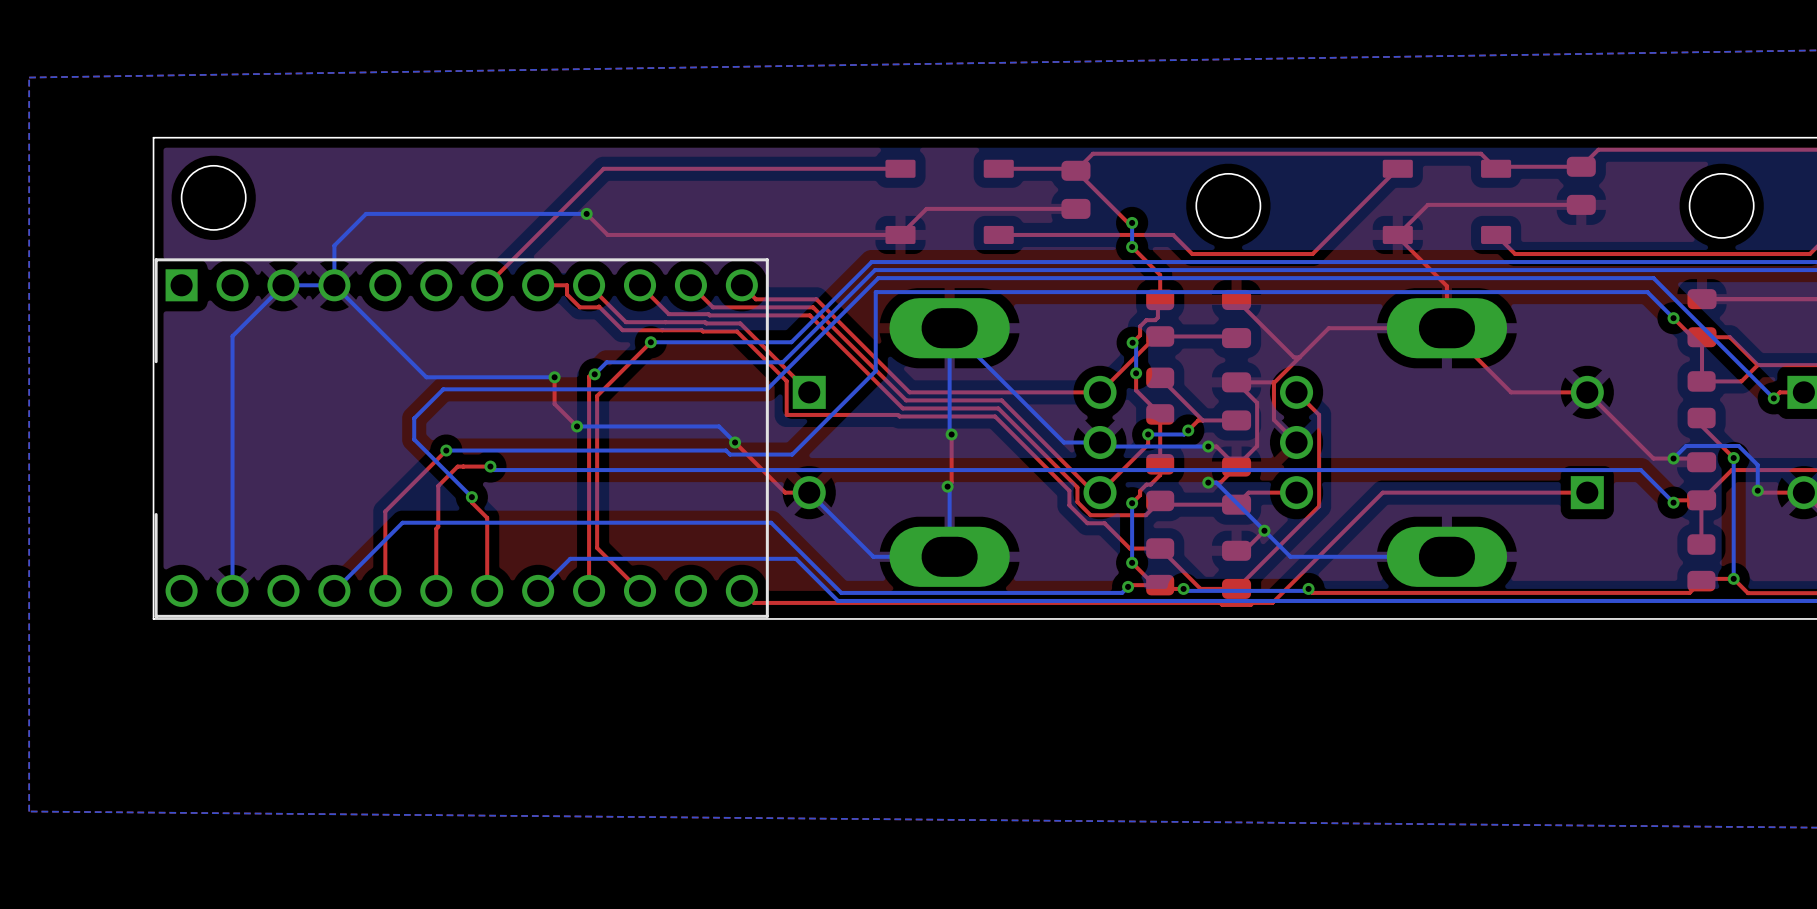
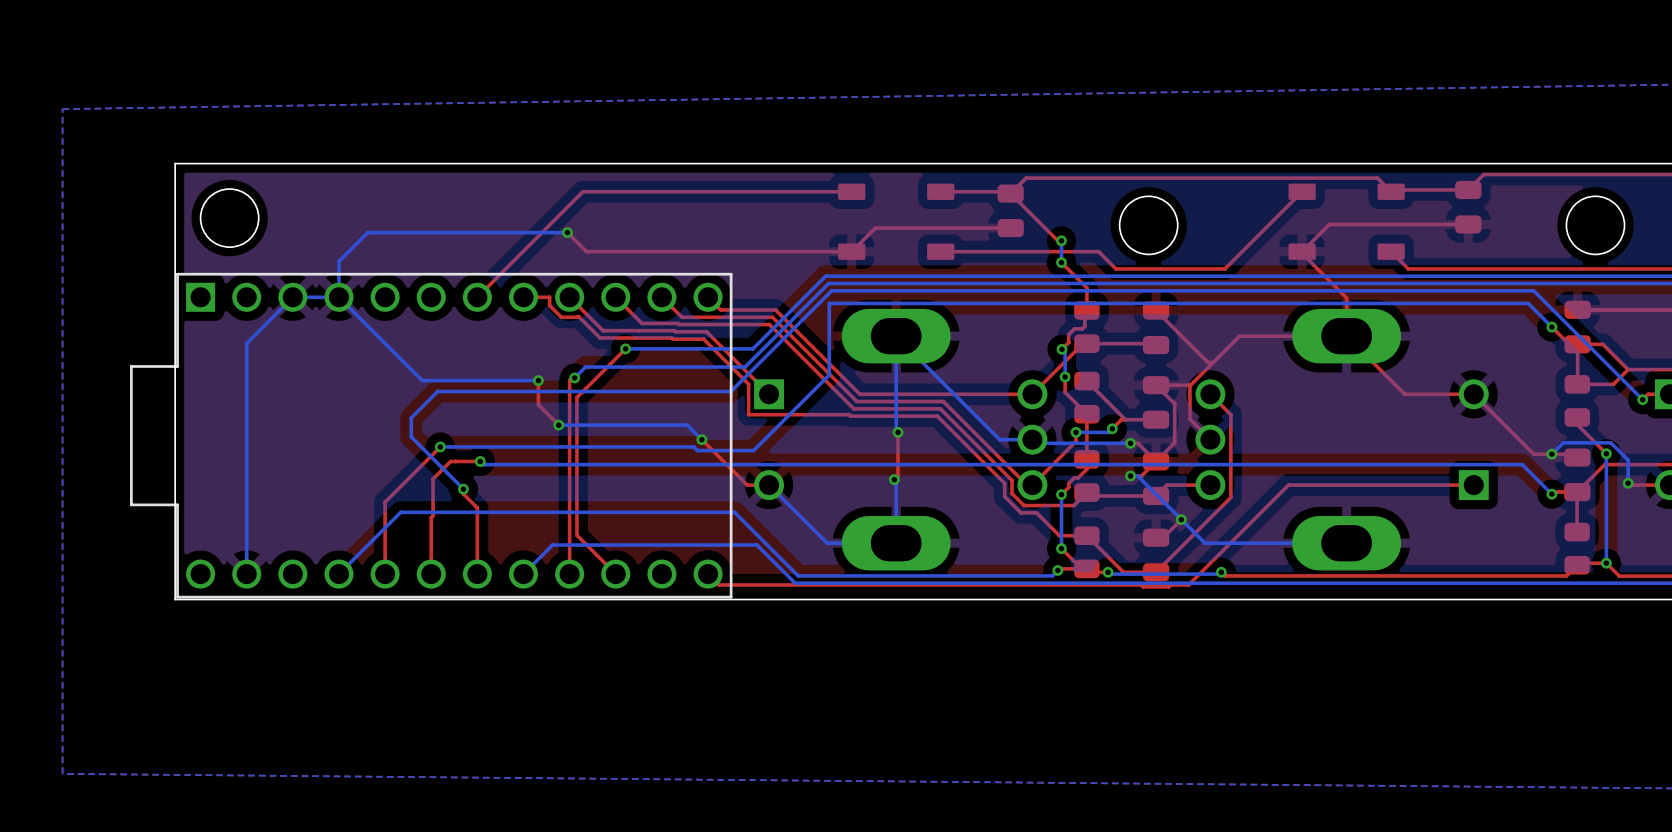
part: none -> (431, 435)
part: (461, 438) -> none

